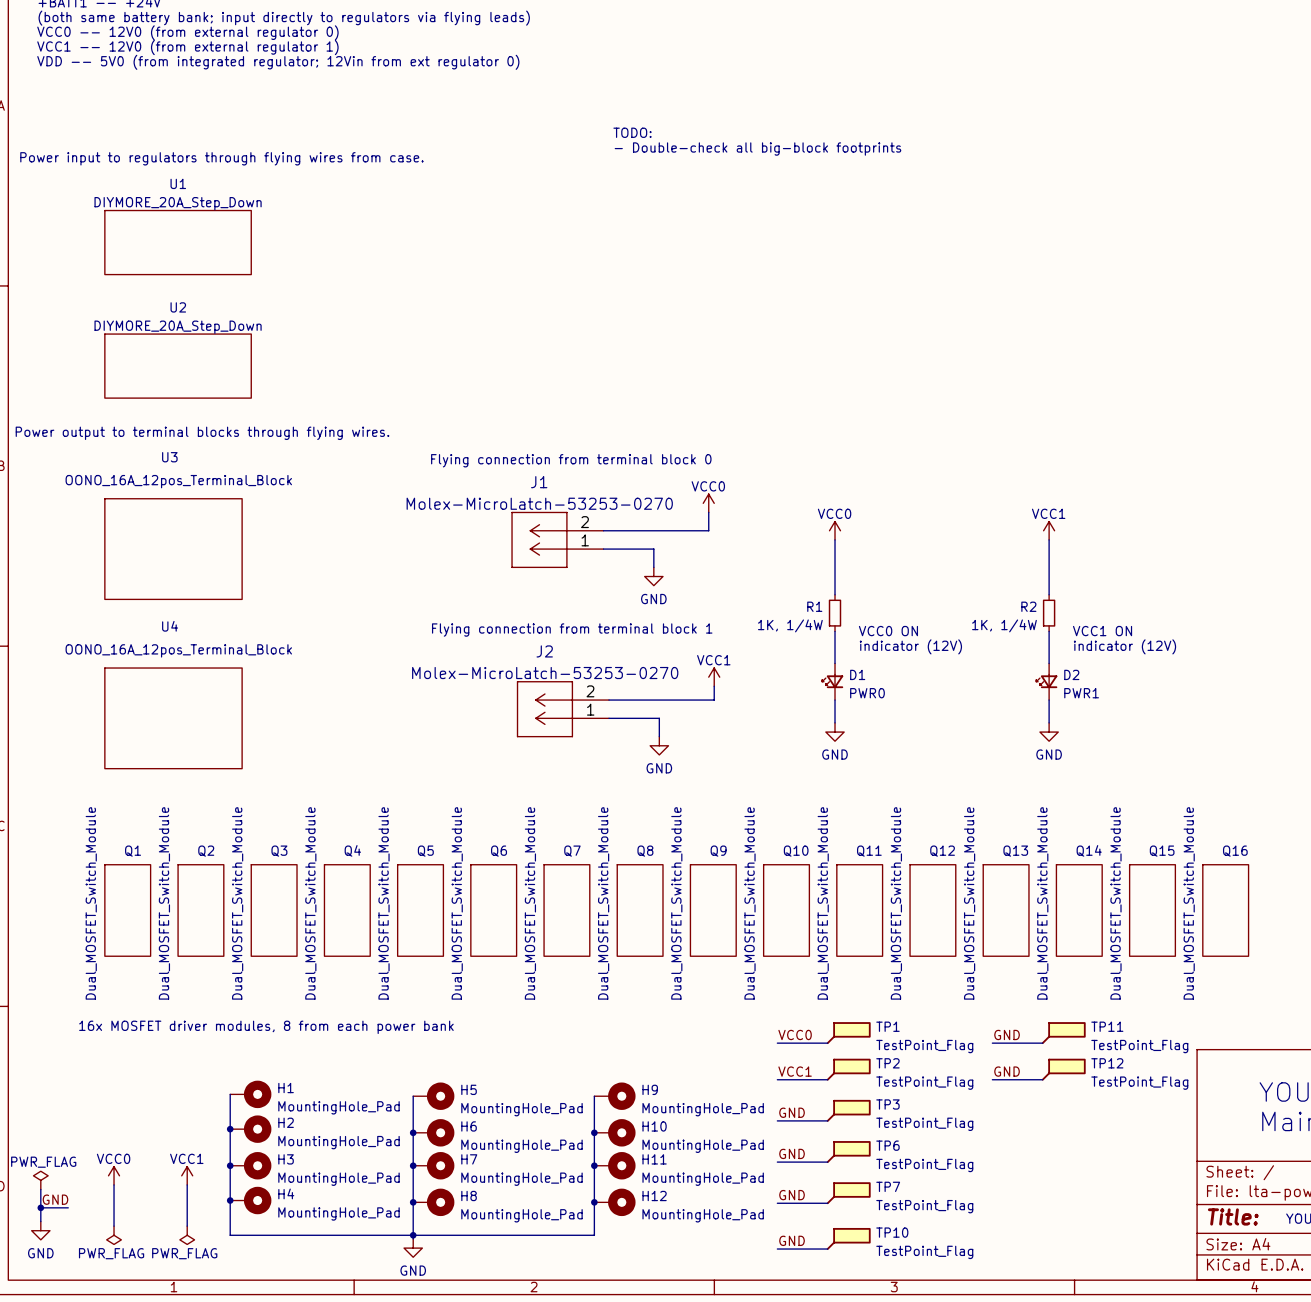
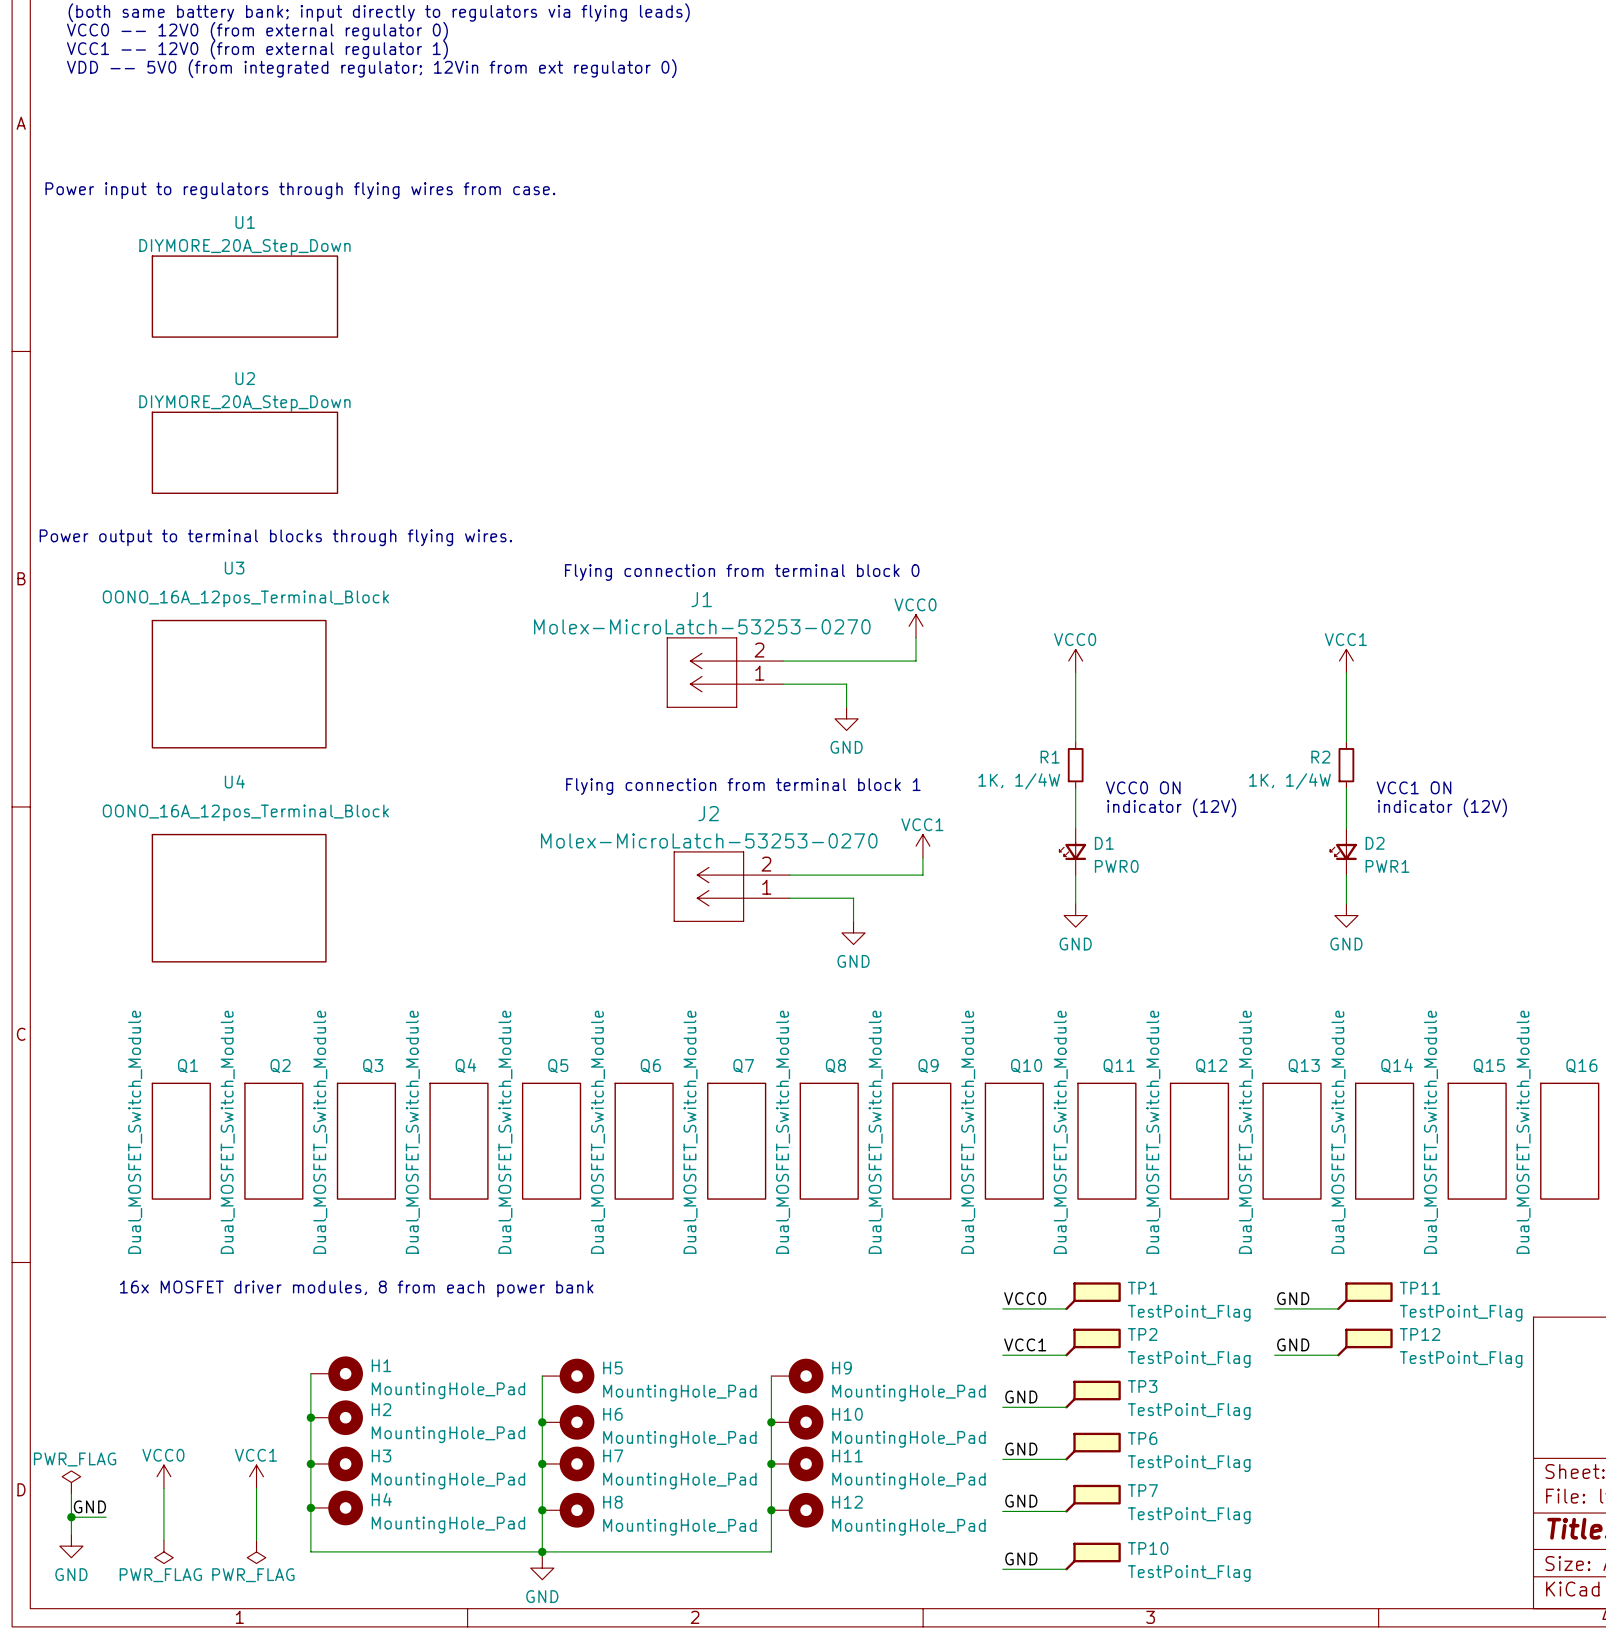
text: TODO: (632, 132) -> none
text: - Double-check all big-block footprints (757, 149) -> none

